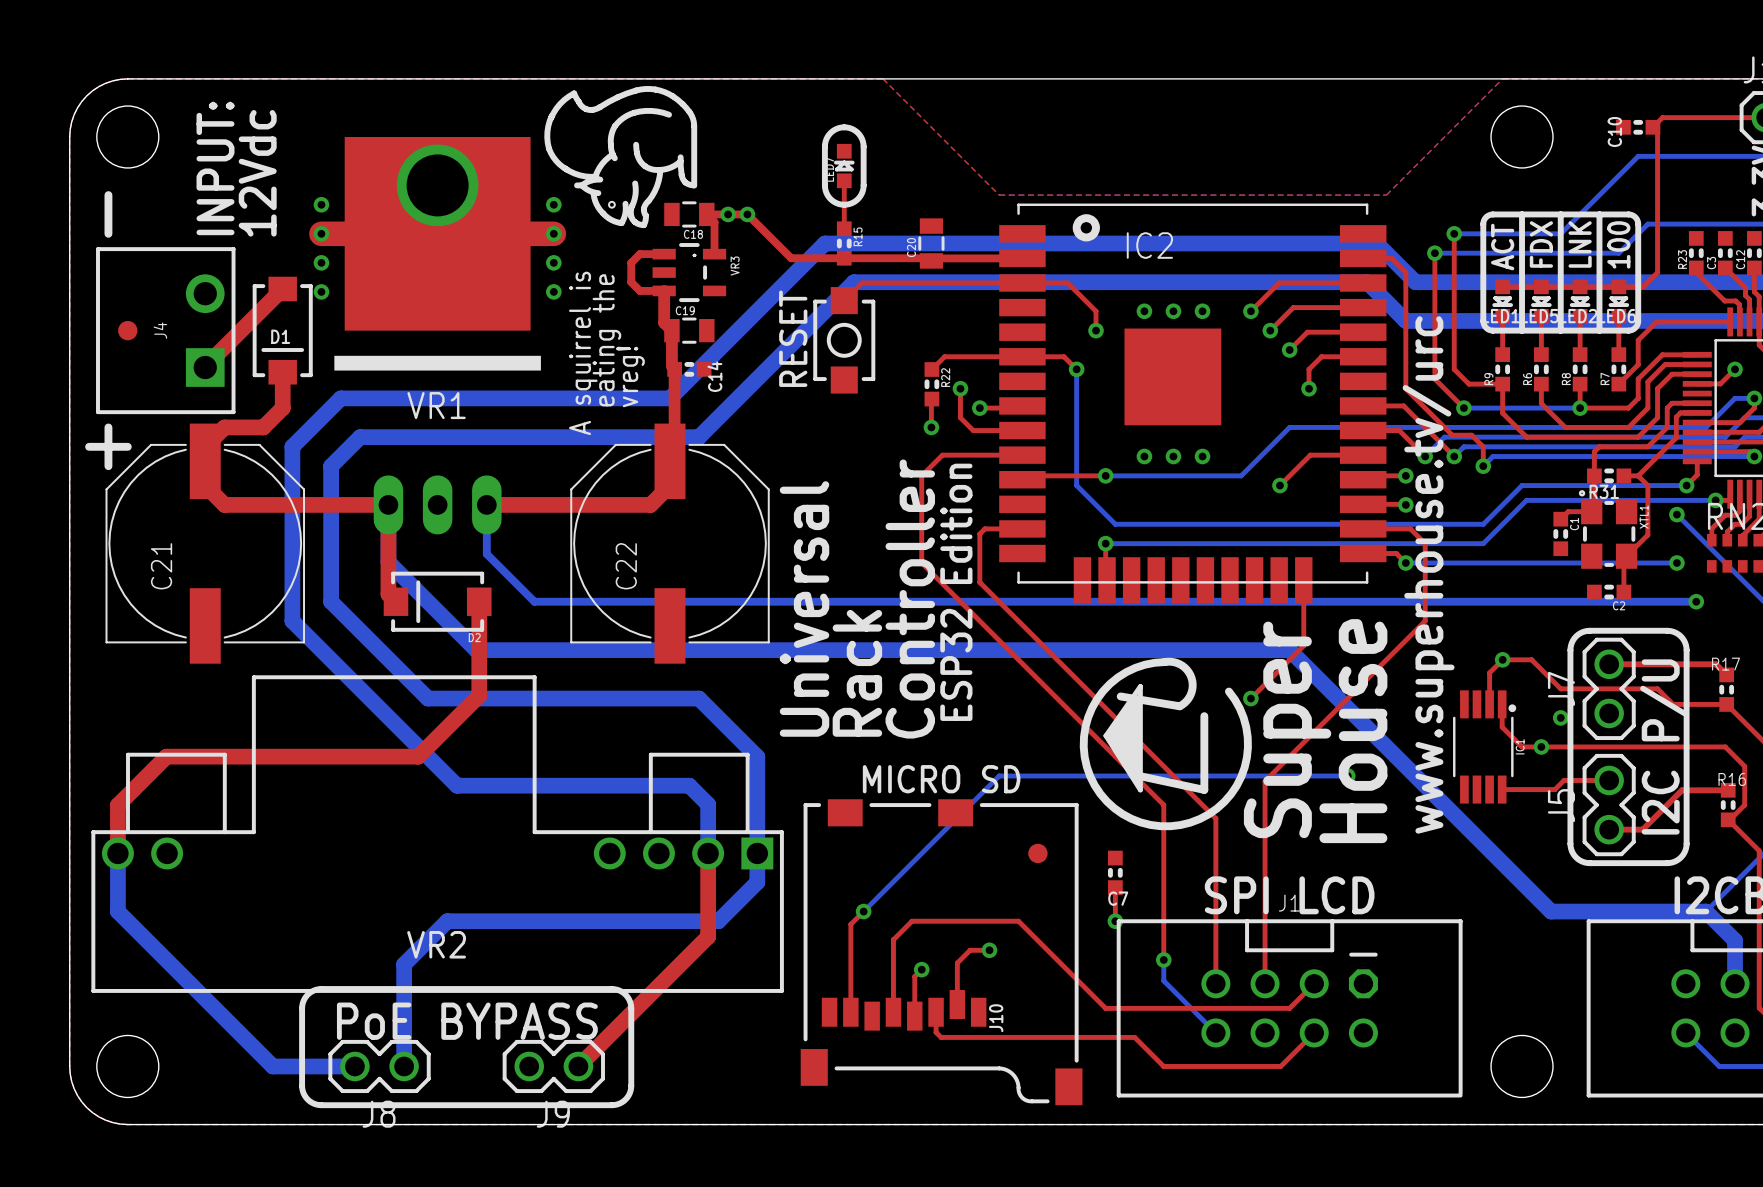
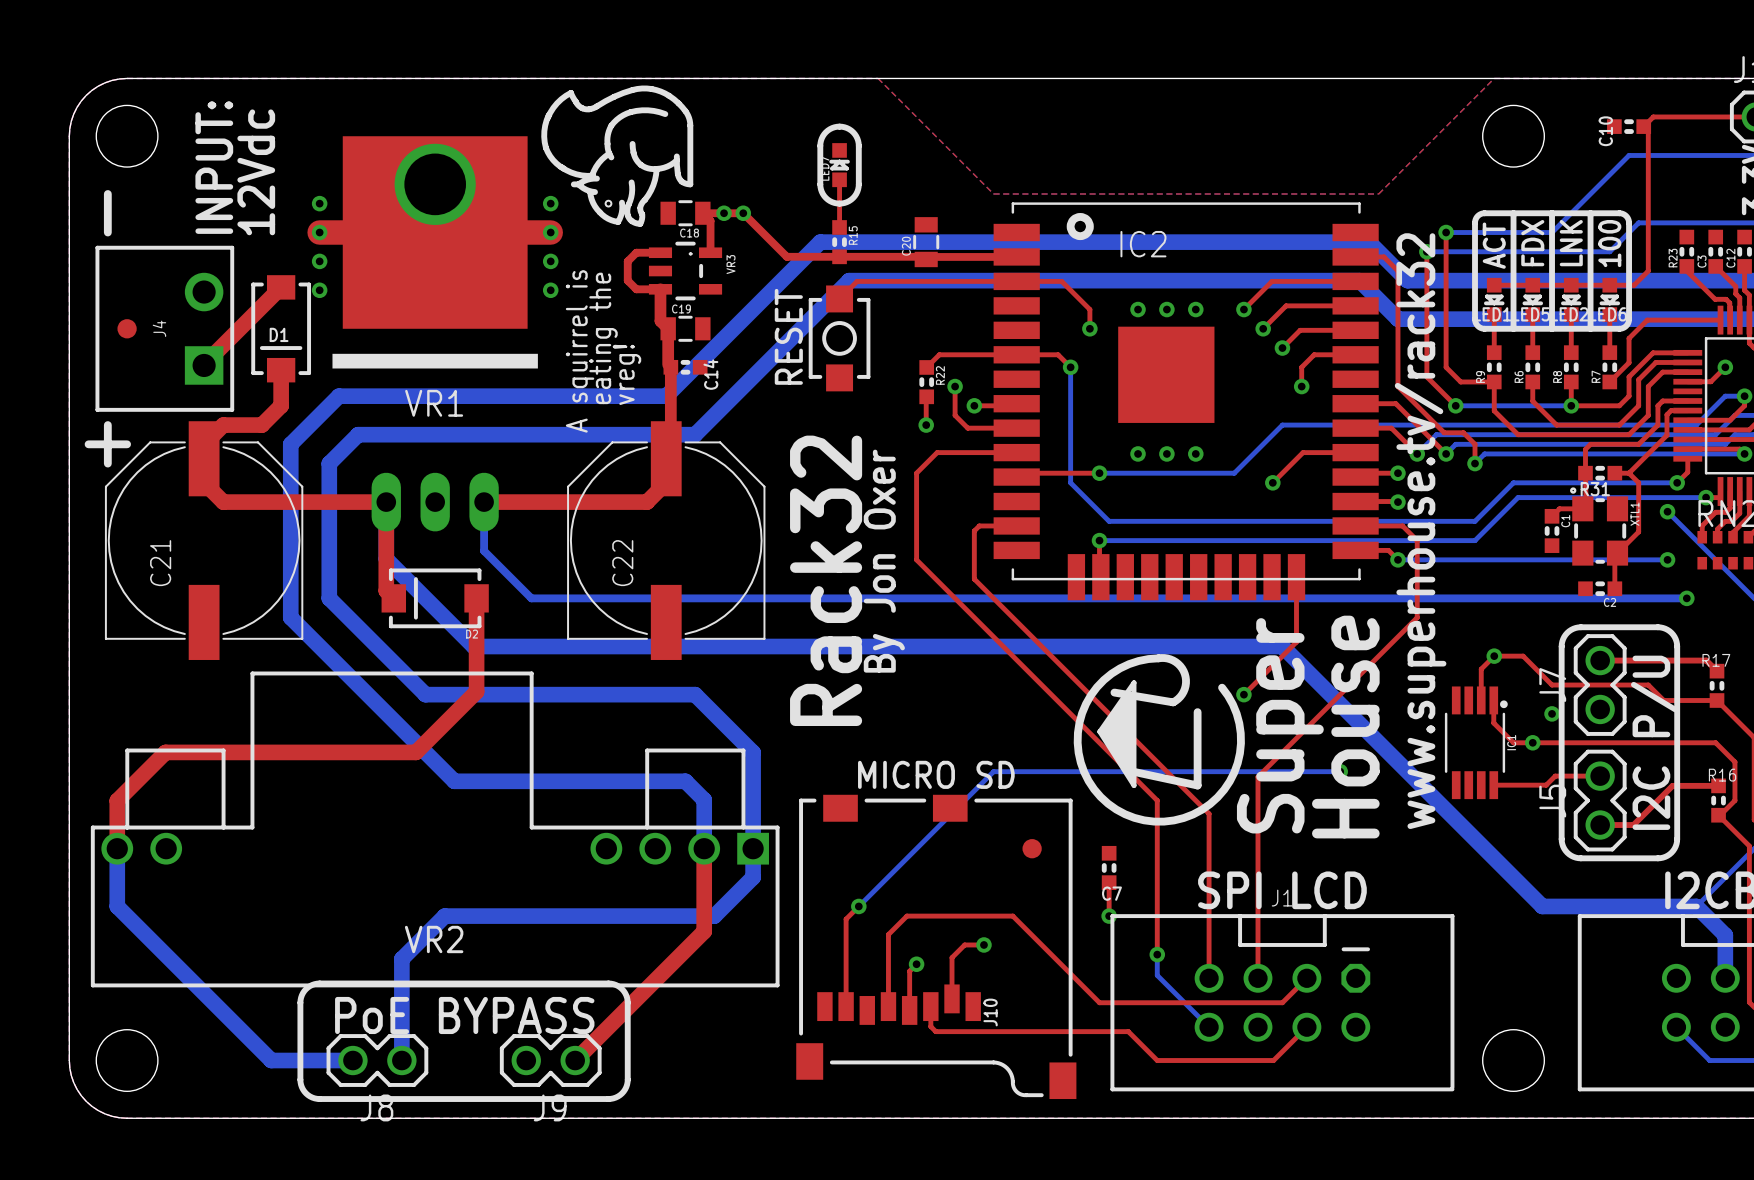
text: none -> By Jon Oxer (884, 561)
text: www.superhouse.tv/urc (1428, 574) -> www.superhouse.tv/rack32 (1420, 531)
text: ESP32 Edition (956, 592) -> none
text: Controller (910, 599) -> none
text: Universal (804, 608) -> none
text: Rack (857, 673) -> Rack32 (826, 580)

